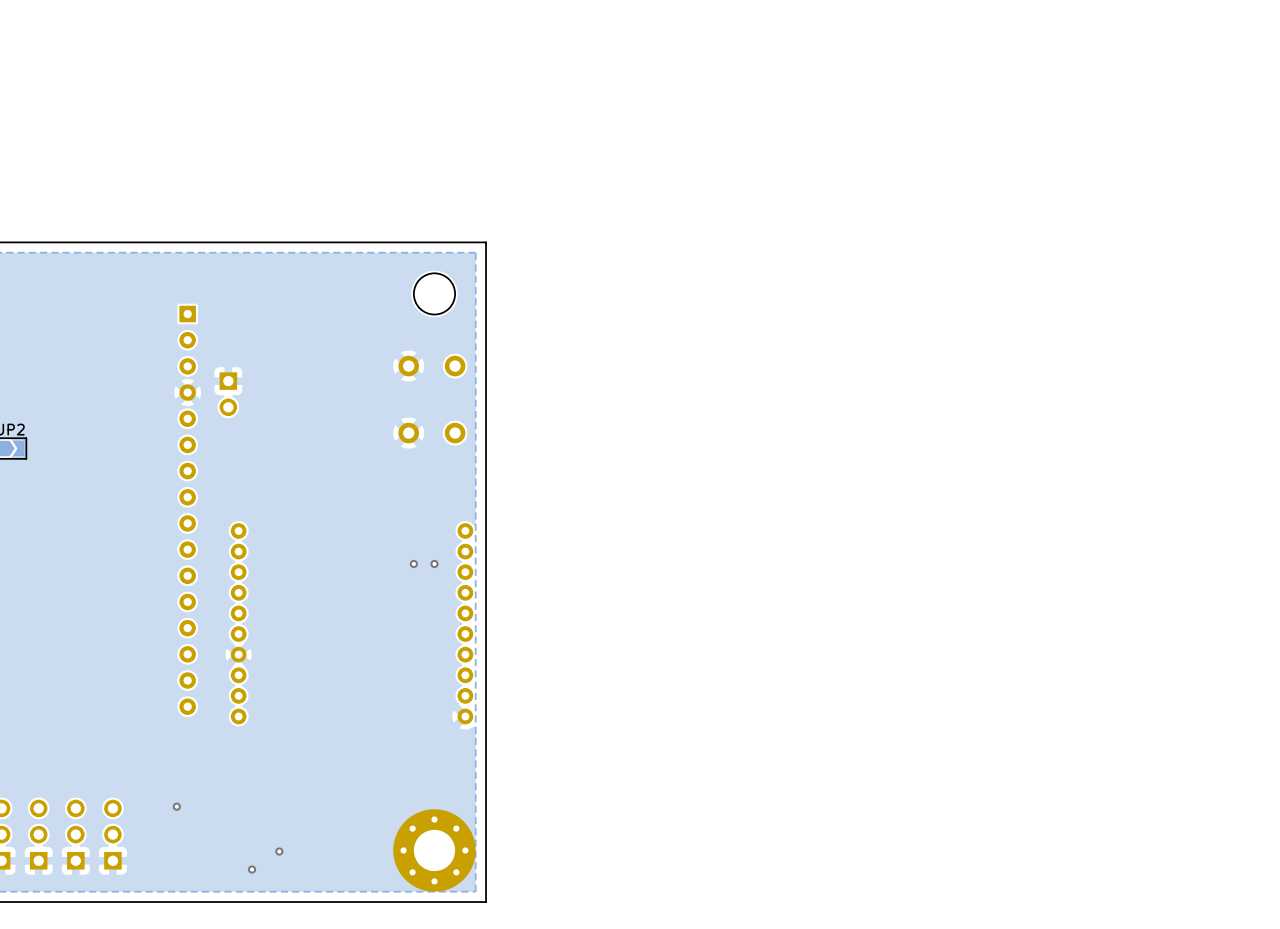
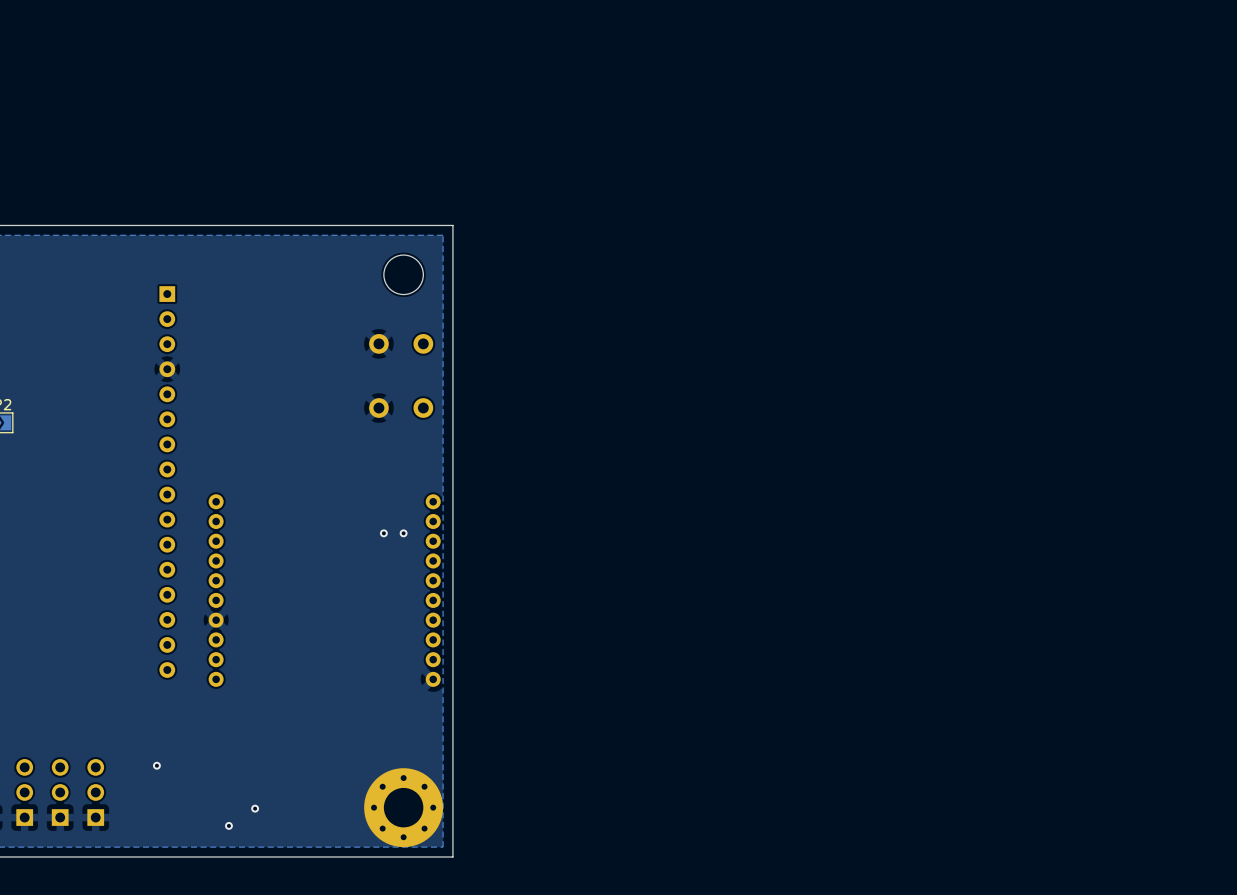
part: (228, 394) -> none

